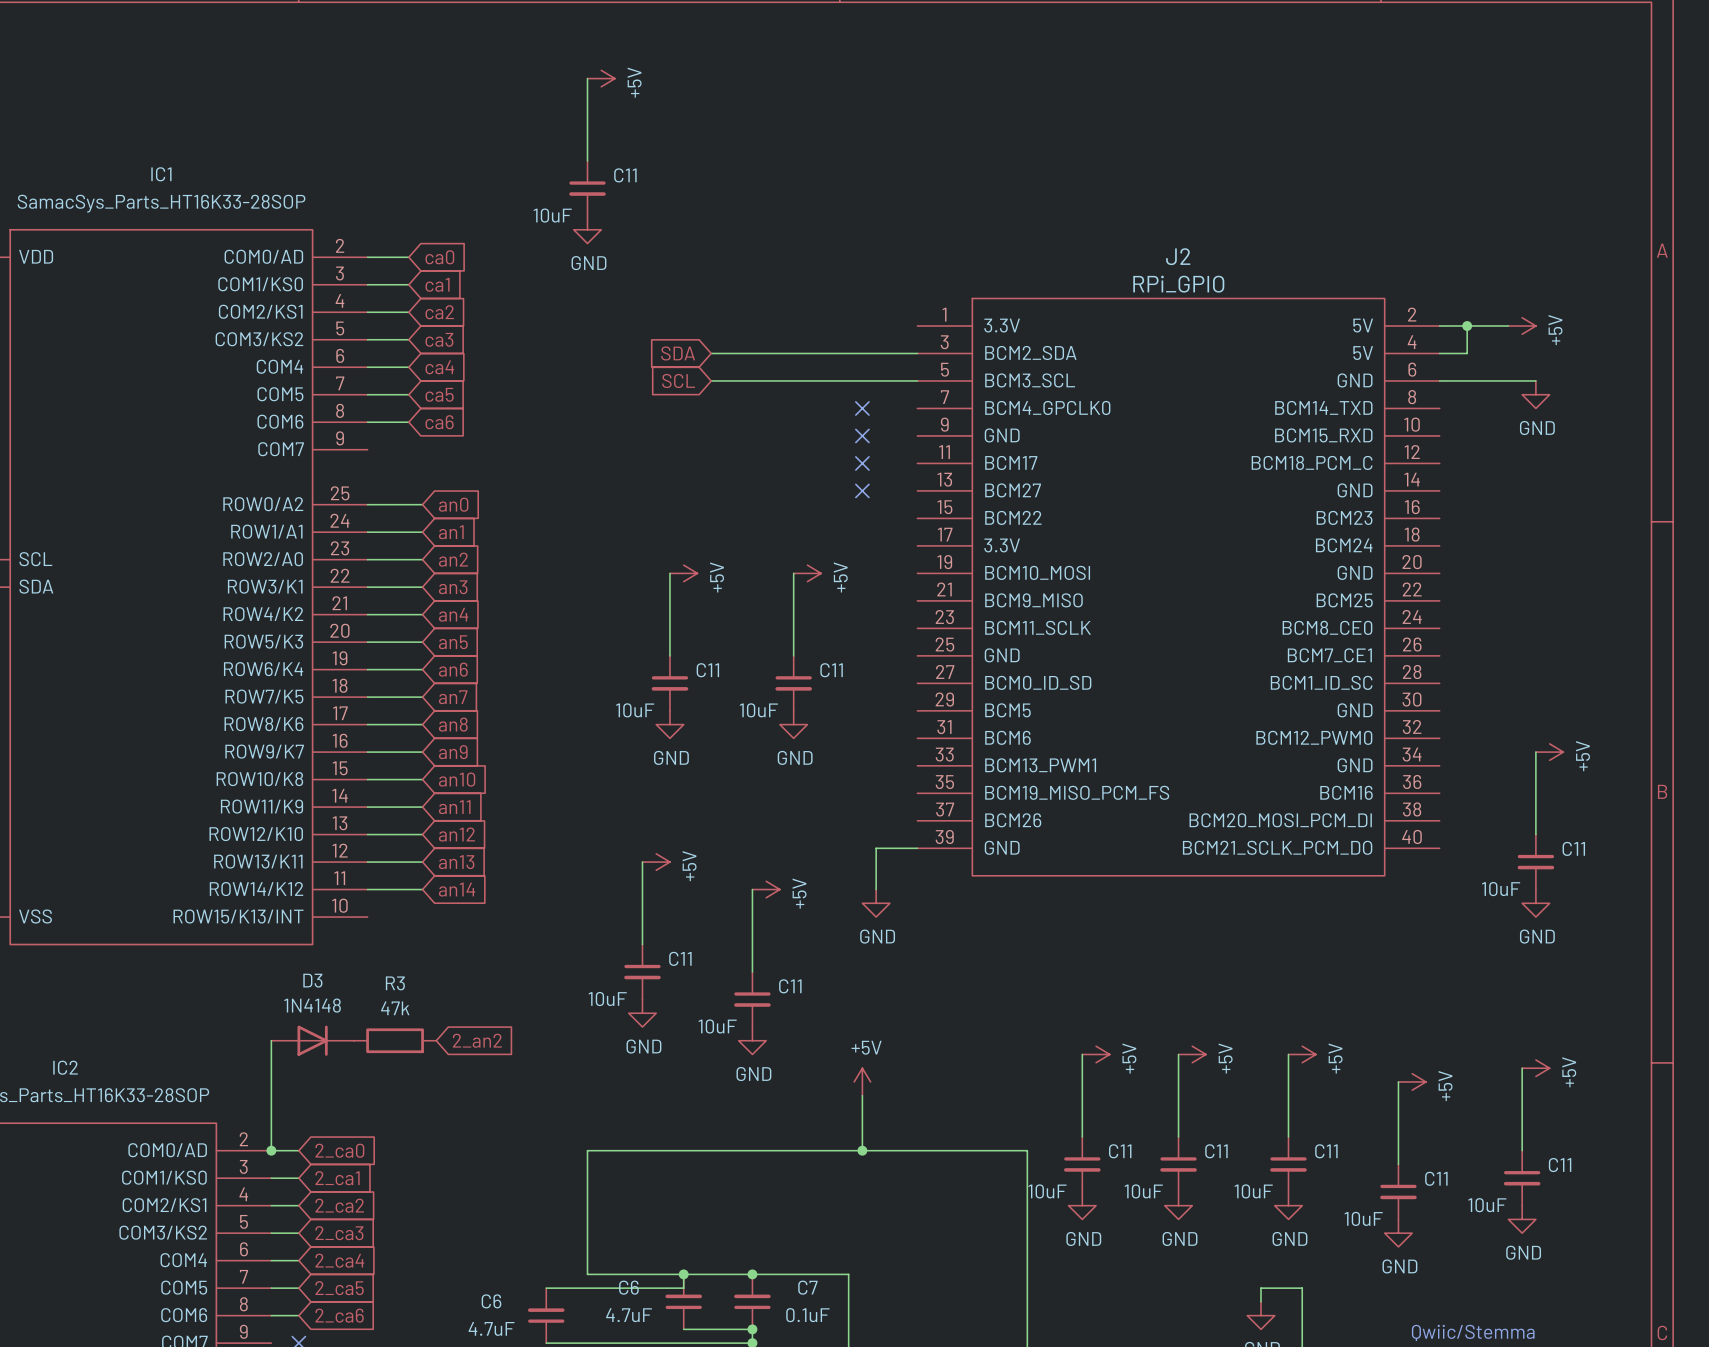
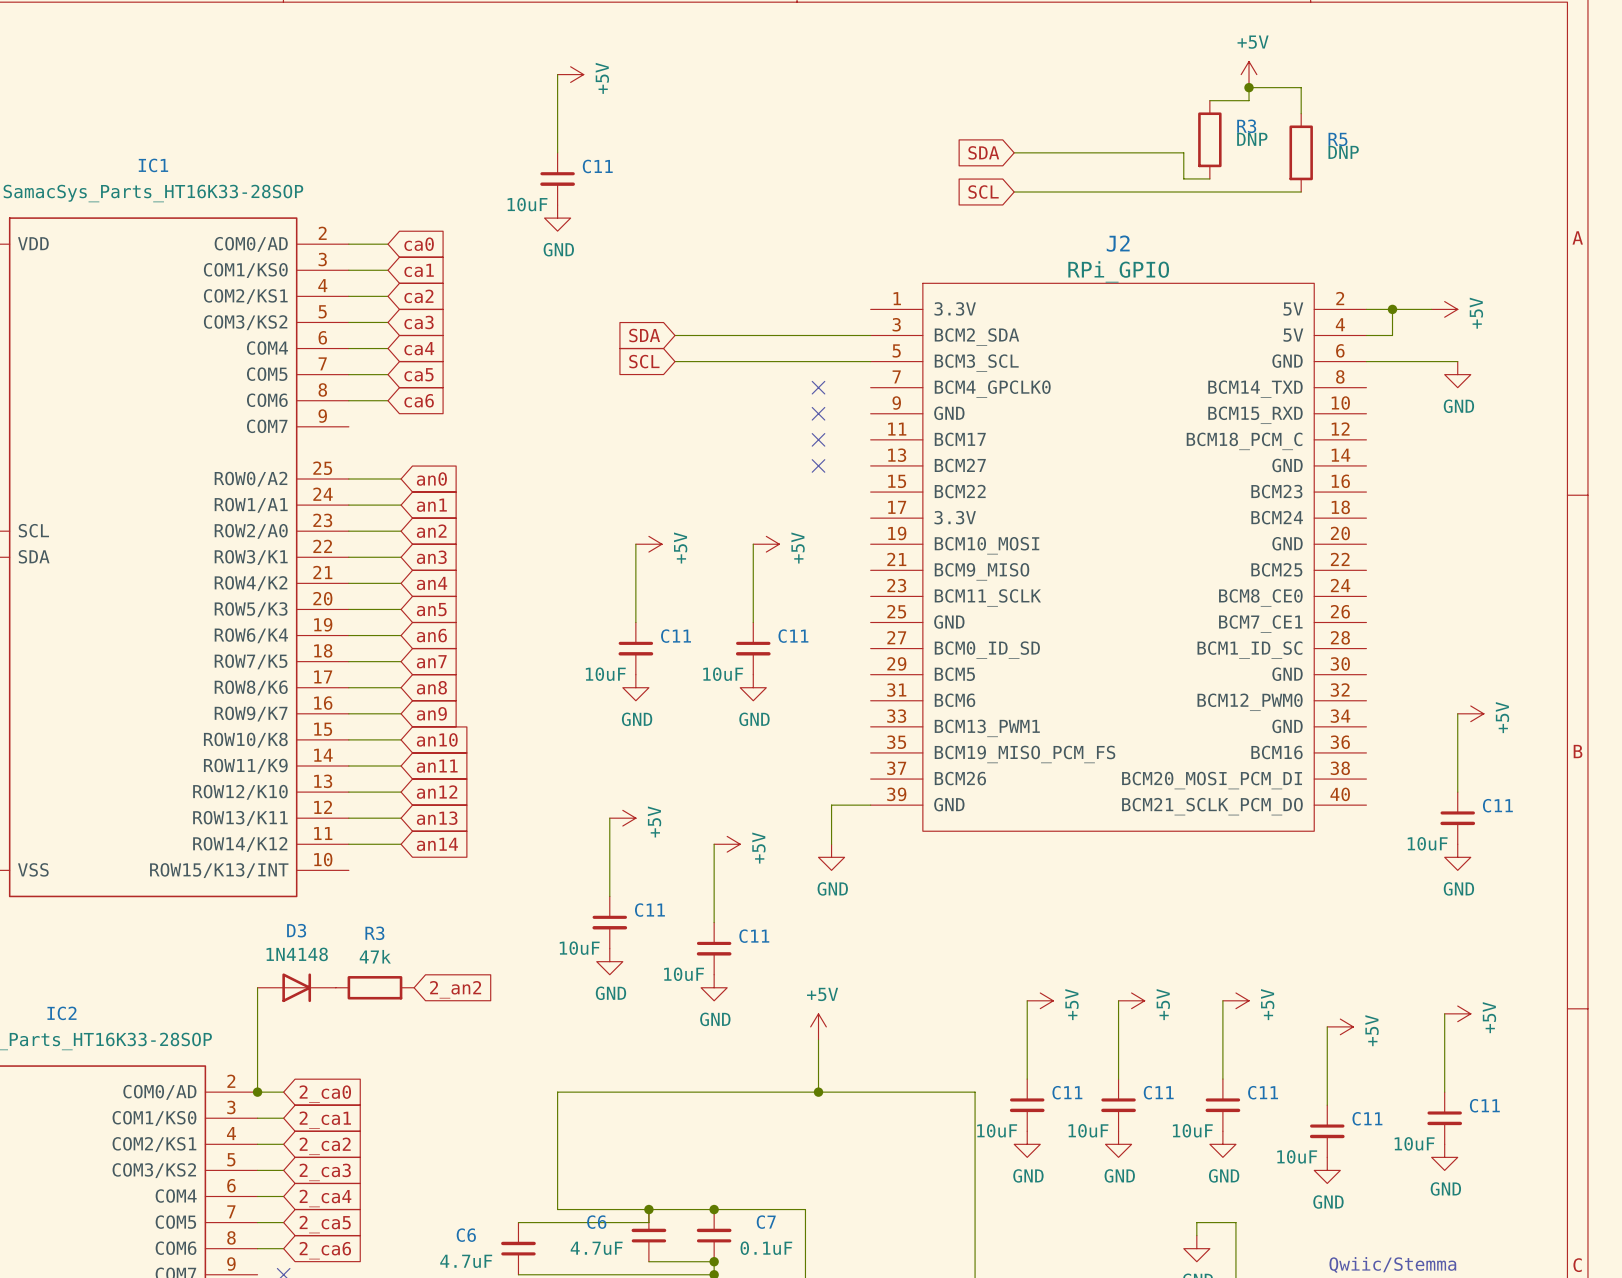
power symbol: none -> +5V (1249, 74)
junction: none -> (1249, 87)
wire: none -> (1209, 100) (1249, 100) (1249, 87) (1301, 87) (1301, 113)
R3: none -> DNP (1209, 139)
global label: none -> SDA (983, 152)
wire: none -> (1014, 152) (1183, 152) (1183, 178) (1209, 178)
R5: none -> DNP (1301, 152)
global label: none -> SCL (983, 192)
wire: none -> (1014, 192) (1301, 192)

